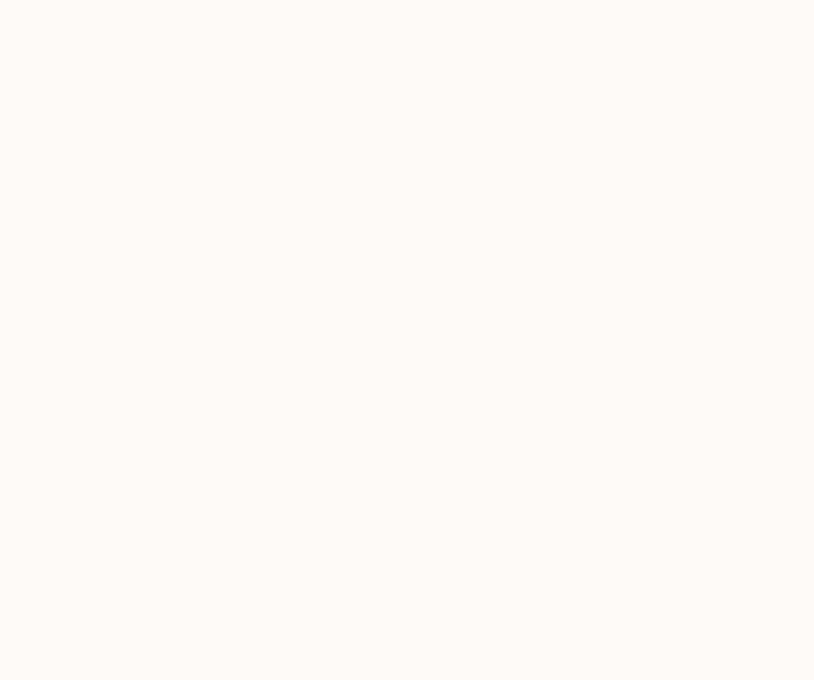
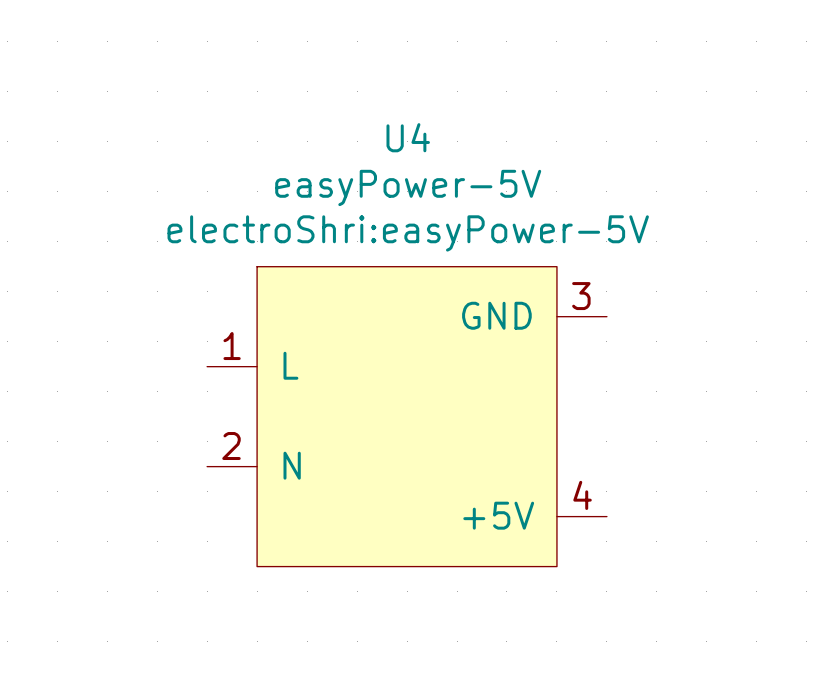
U4: none -> easyPower-5V (407, 416)

